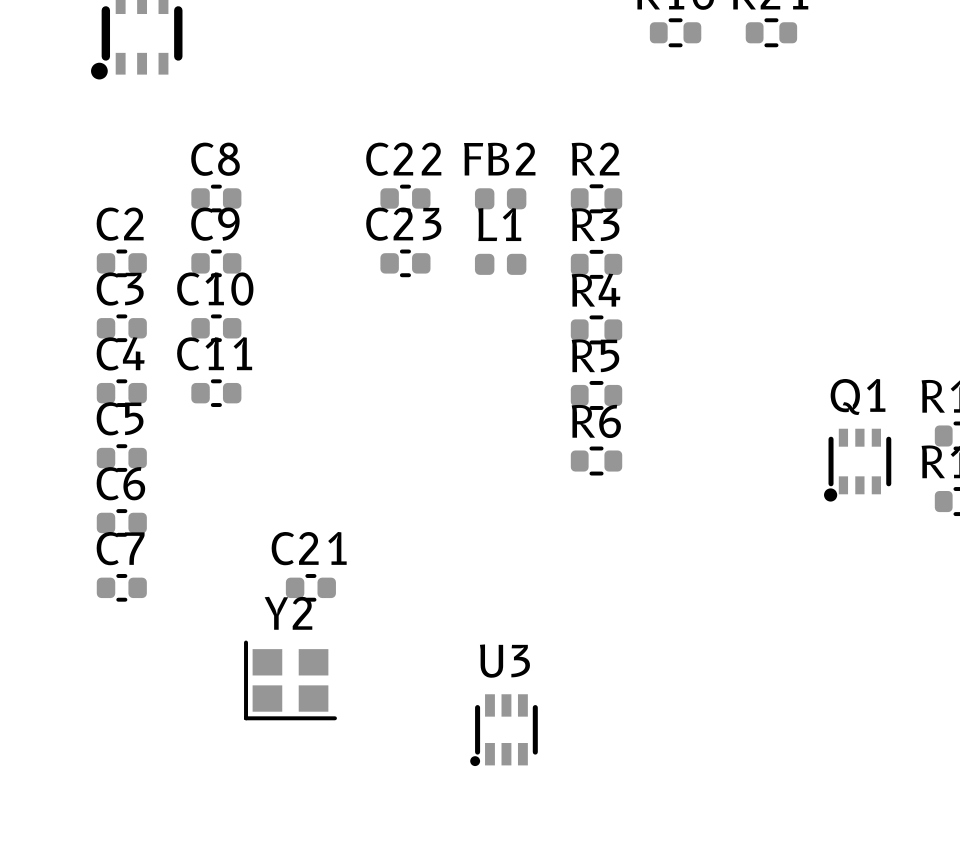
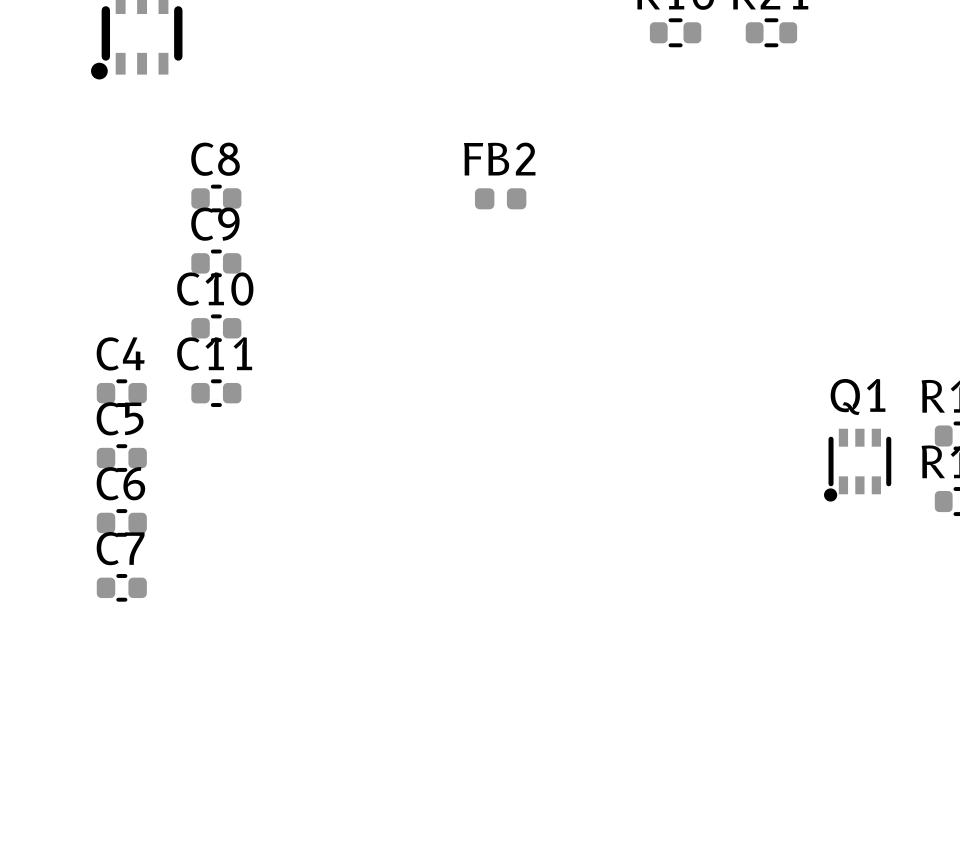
C22: (405, 198) -> none
R2: (596, 198) -> none
C2: (121, 263) -> none
C23: (405, 263) -> none
L1: (500, 264) -> none
R3: (596, 264) -> none
C3: (121, 328) -> none
R4: (596, 329) -> none
R5: (596, 395) -> none
R6: (596, 461) -> none
C21: (310, 587) -> none
Y2: (290, 680) -> none
U3: (504, 730) -> none

